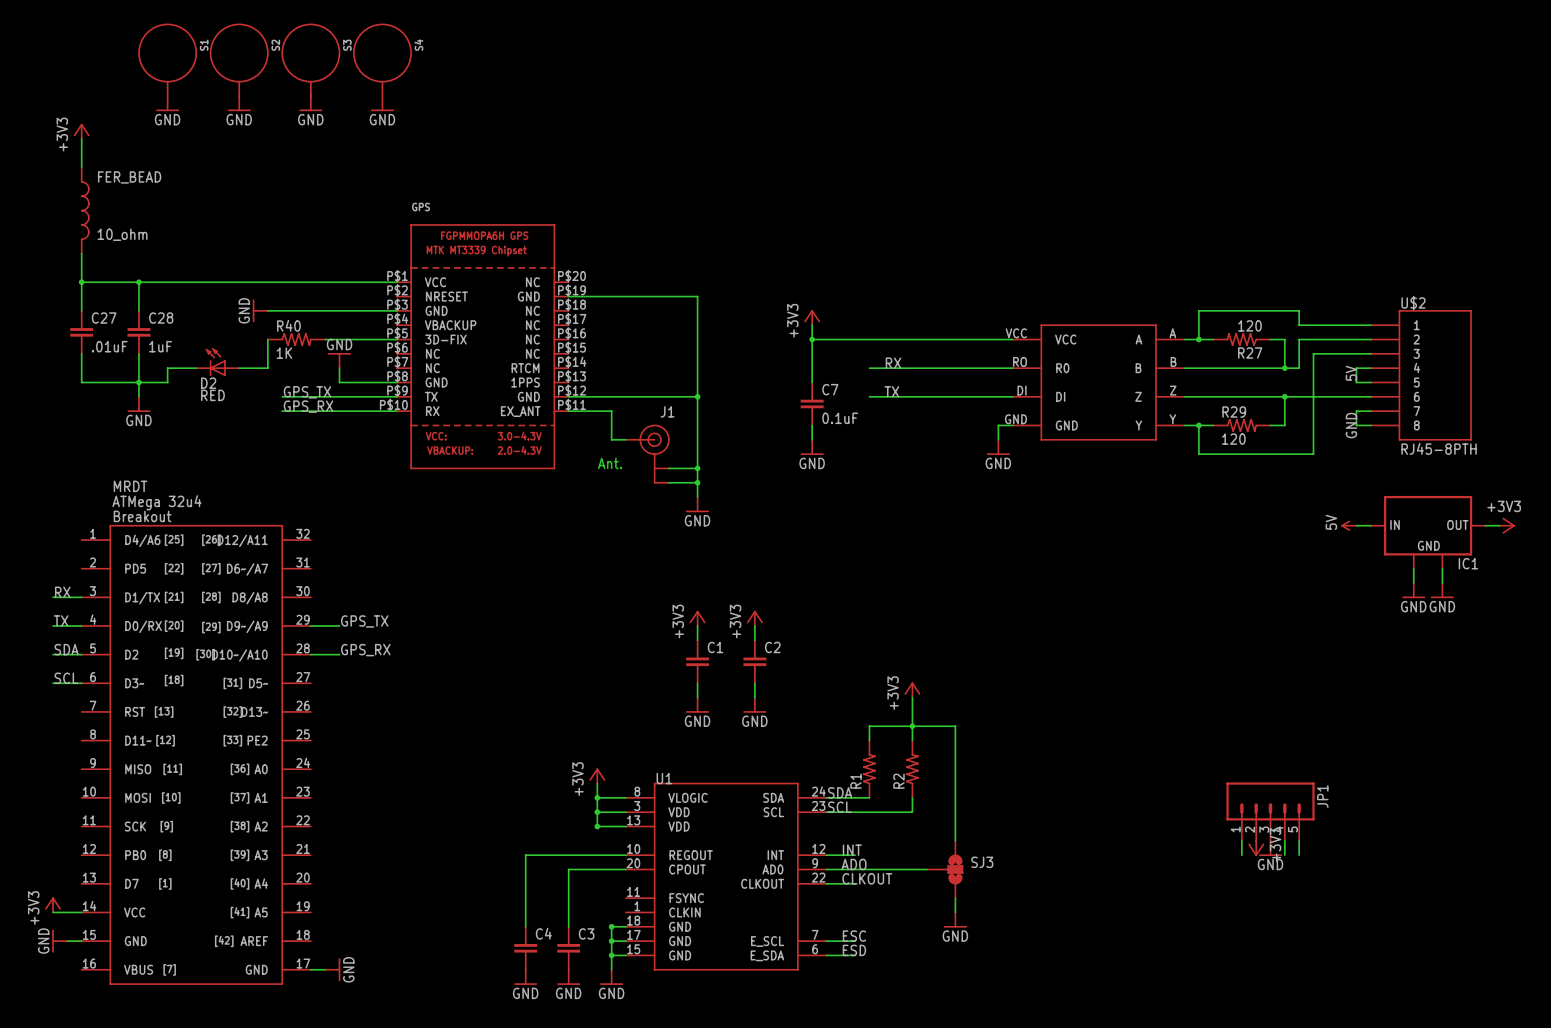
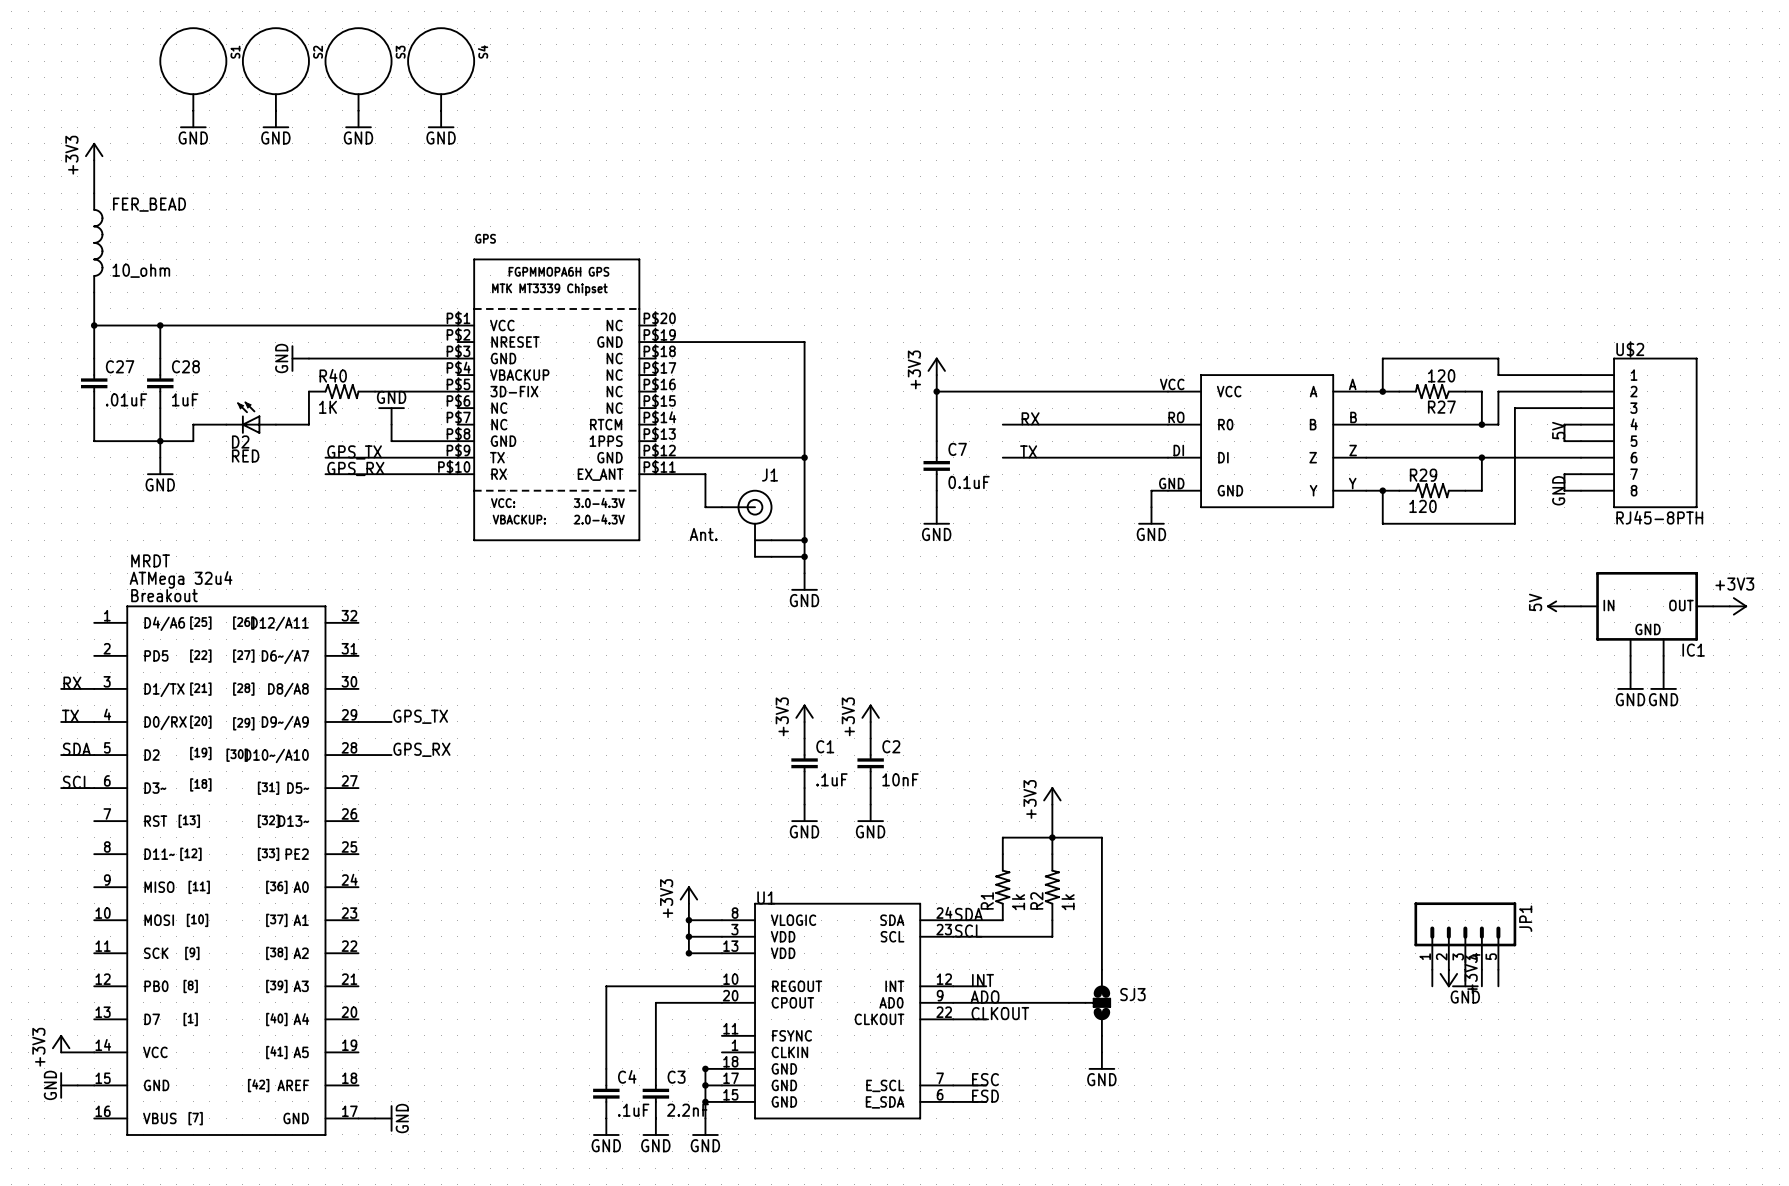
C1 value: none -> .1uF (831, 779)
C2 value: none -> 10nF (900, 779)
R1 value: none -> 1k (1018, 902)
R2 value: none -> 1k (1068, 902)
C4 value: none -> .1uF (633, 1110)
C3 value: none -> 2.2nF (687, 1110)

